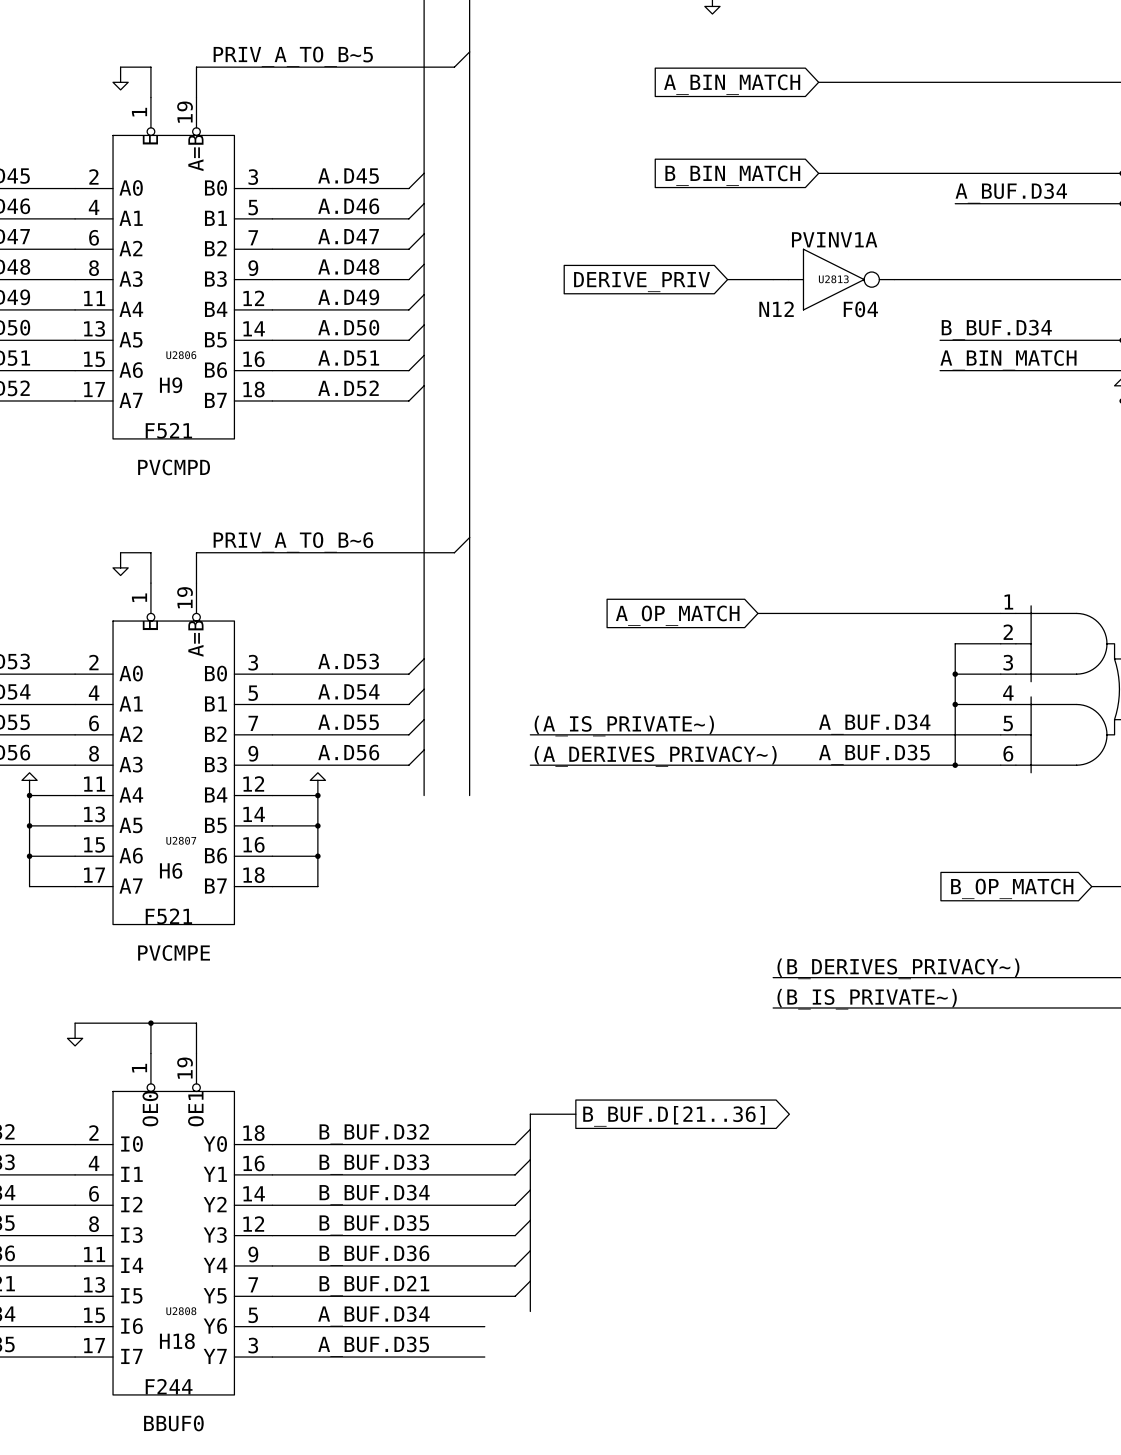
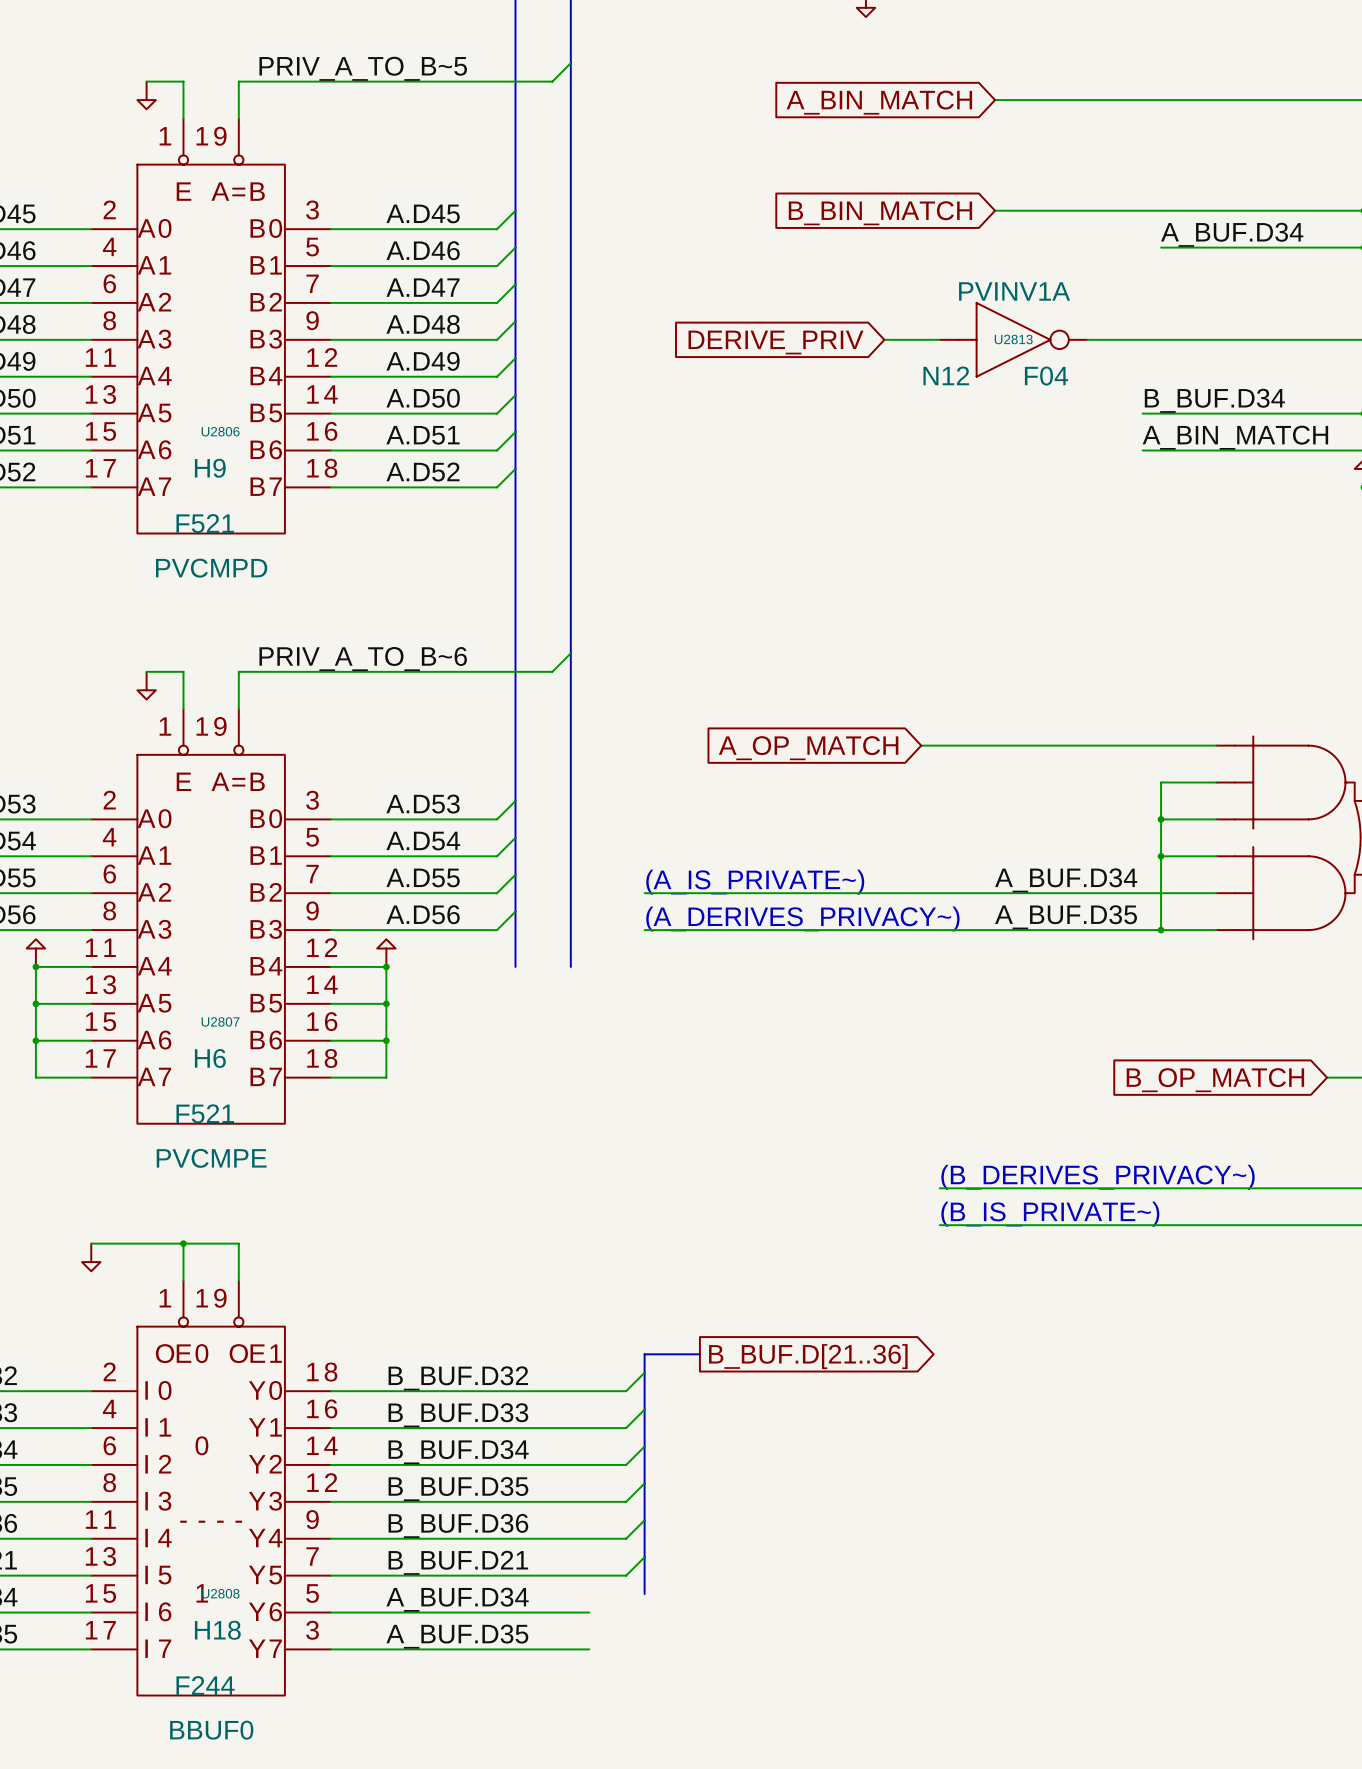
U2806 symbol: [75, 97, 273, 439] -> [91, 118, 332, 534]
U2807 symbol: [75, 583, 273, 925] -> [91, 708, 332, 1124]
part pin number: 1 (1008, 601) -> none
part pin number: 2 (1008, 632) -> none
part pin number: 3 (1008, 662) -> none
part pin number: 4 (1008, 693) -> none
part pin number: 5 (1008, 723) -> none
part pin number: 6 (1008, 753) -> none
U2808 symbol: [75, 1053, 273, 1395] -> [91, 1280, 332, 1696]

